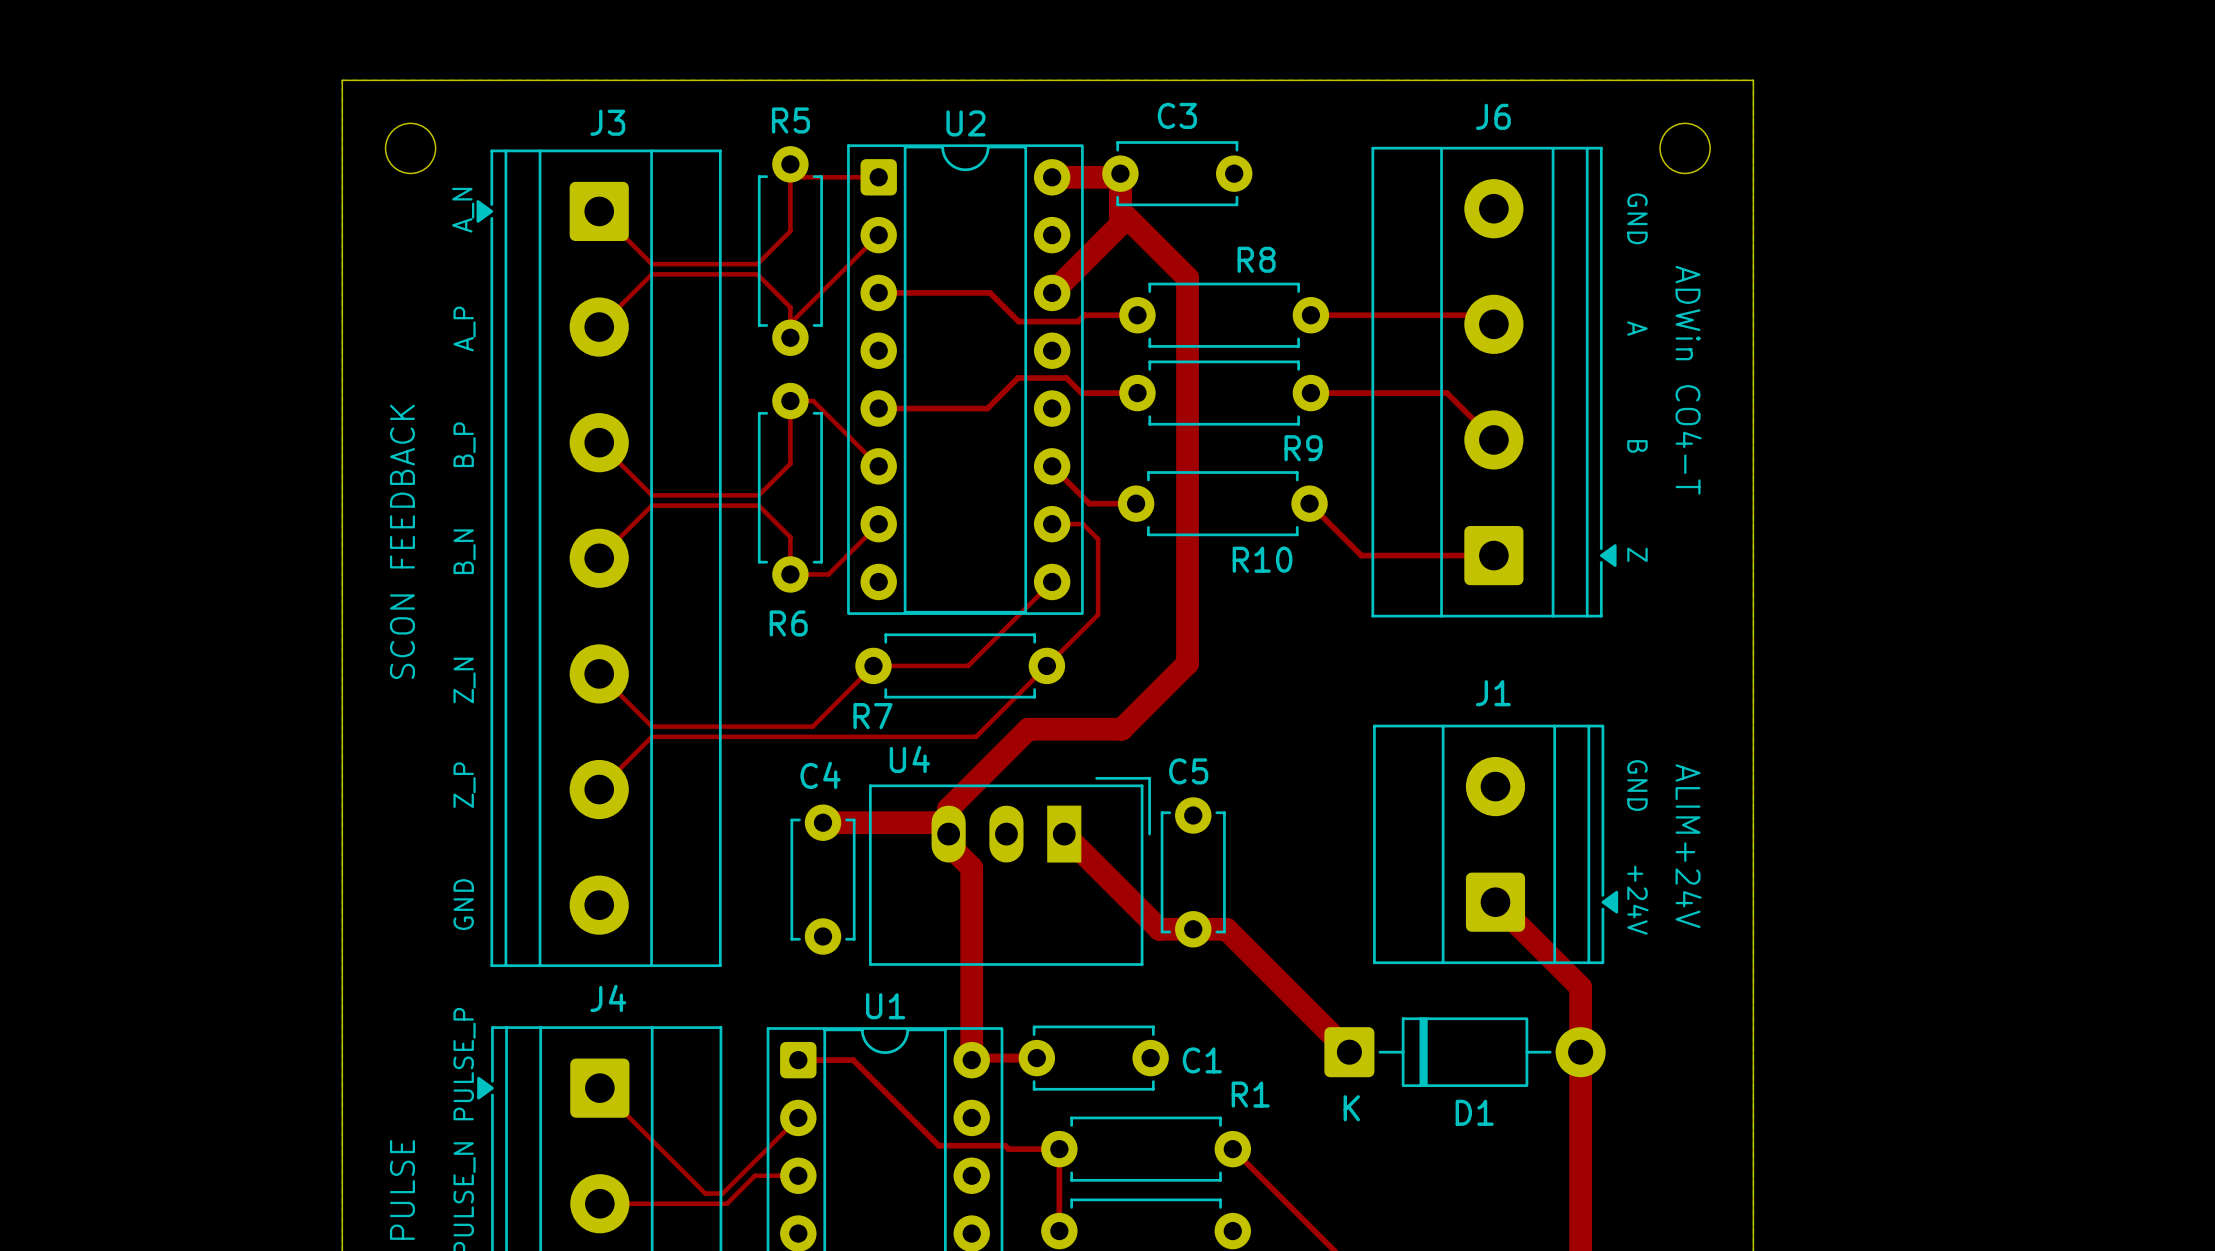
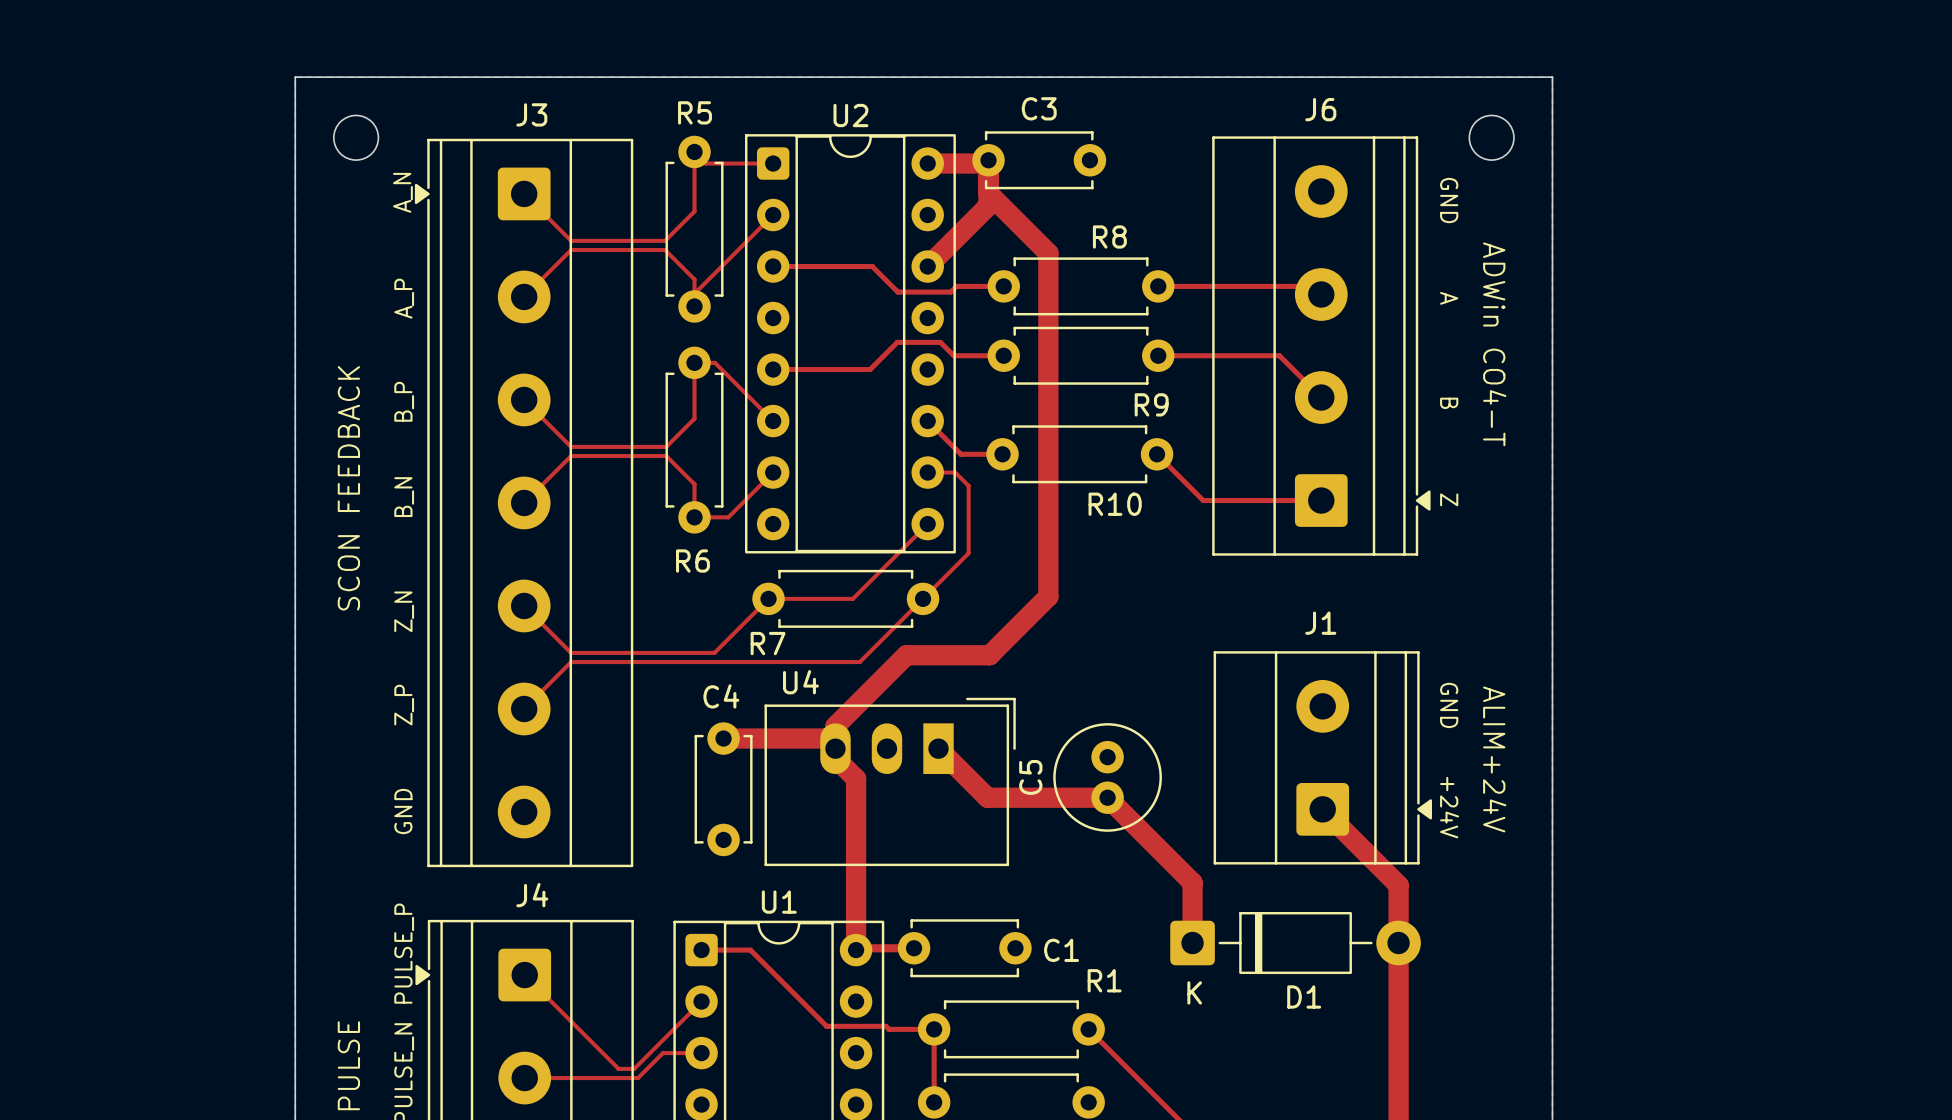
C5 name position: C5 (1188, 771) -> C5 (1030, 777)
C5 footprint: [1160, 797, 1226, 948] -> [1053, 723, 1162, 832]
top track: (1119, 889) (1159, 929) (1226, 929) (1349, 1052) -> (987, 797) (1107, 797) (1192, 882) (1192, 943)

